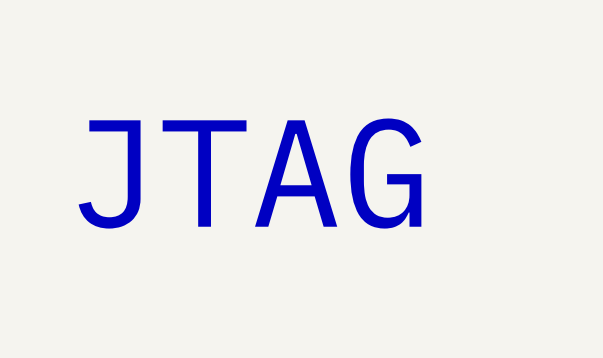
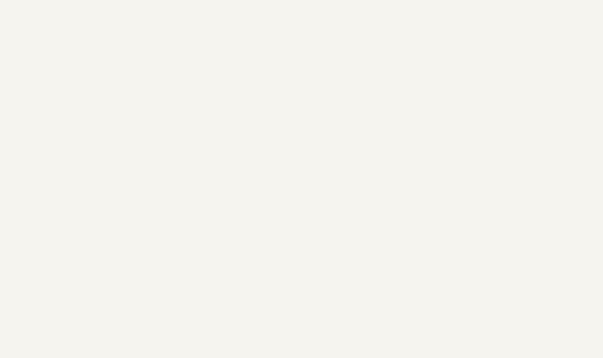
text: JTAG (250, 173) -> none

